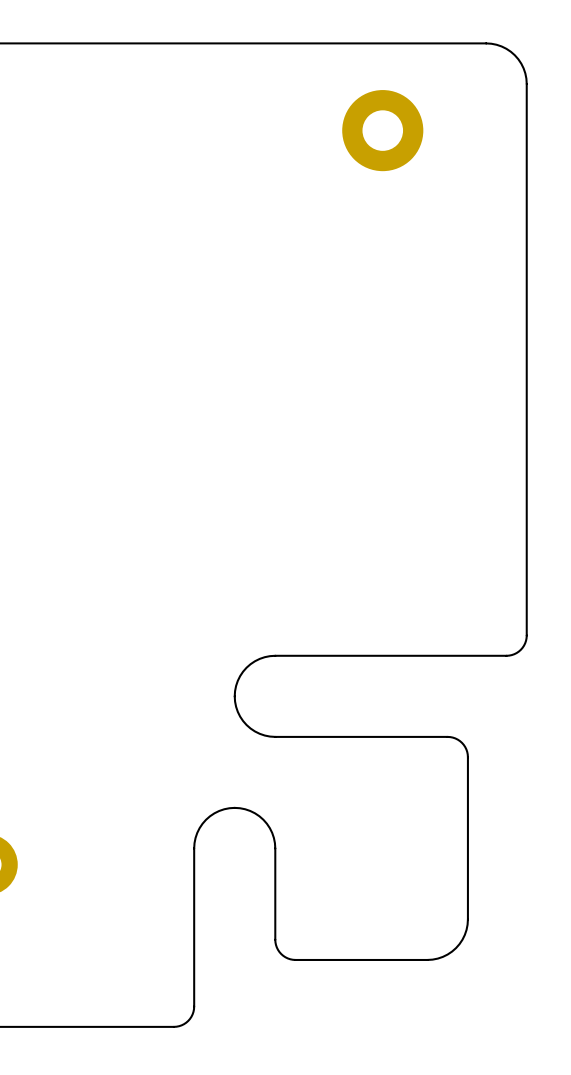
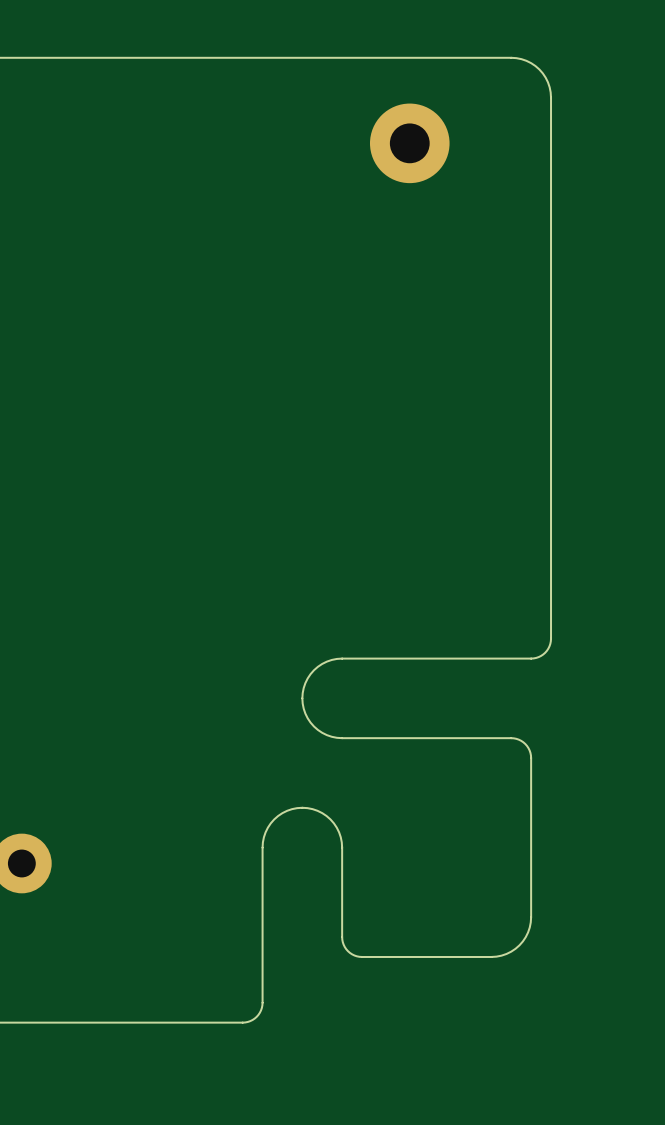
board edge: (313, 655) (270, 656) (255, 661) (240, 676) (234, 696) (240, 716) (255, 731) (270, 736) (313, 736) -> (342, 658) (326, 661) (314, 670) (305, 683) (302, 698) (305, 713) (314, 726) (326, 735) (342, 738)
board edge: (447, 736) (455, 738) (462, 742) (467, 754) (467, 924) (462, 939) (452, 951) (437, 958) (427, 959) -> (473, 738) (516, 738) (525, 743) (530, 752) (530, 922) (522, 941) (506, 953) (491, 956) (453, 956)
board edge: (334, 959) (292, 959) (285, 957) (279, 952) (275, 939) (275, 848) (272, 832) (263, 819) (250, 810) (234, 807) (219, 810) (202, 823) (195, 837) (194, 1009) (188, 1020) (181, 1025) (173, 1026) -> (362, 956) (354, 955) (347, 951) (342, 939) (342, 847) (336, 827) (326, 816) (317, 810) (302, 807) (287, 810) (270, 823) (262, 842) (261, 1010) (256, 1016) (247, 1021) (204, 1022)

